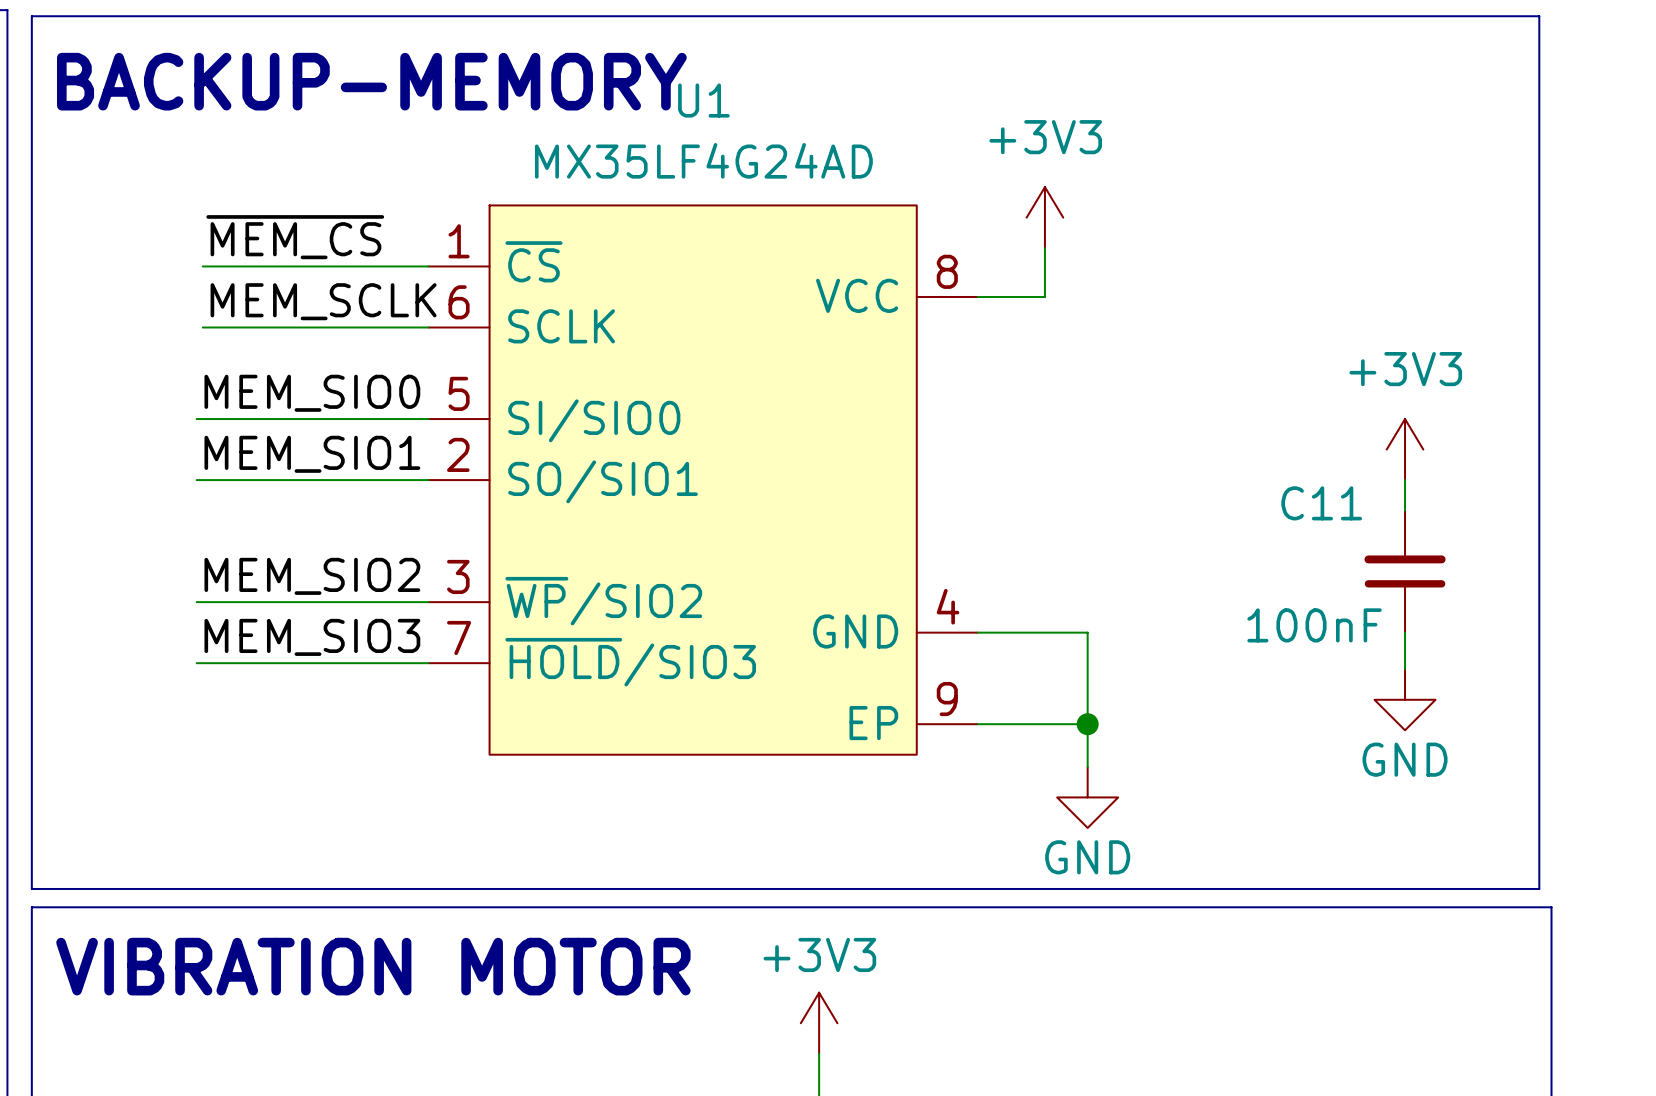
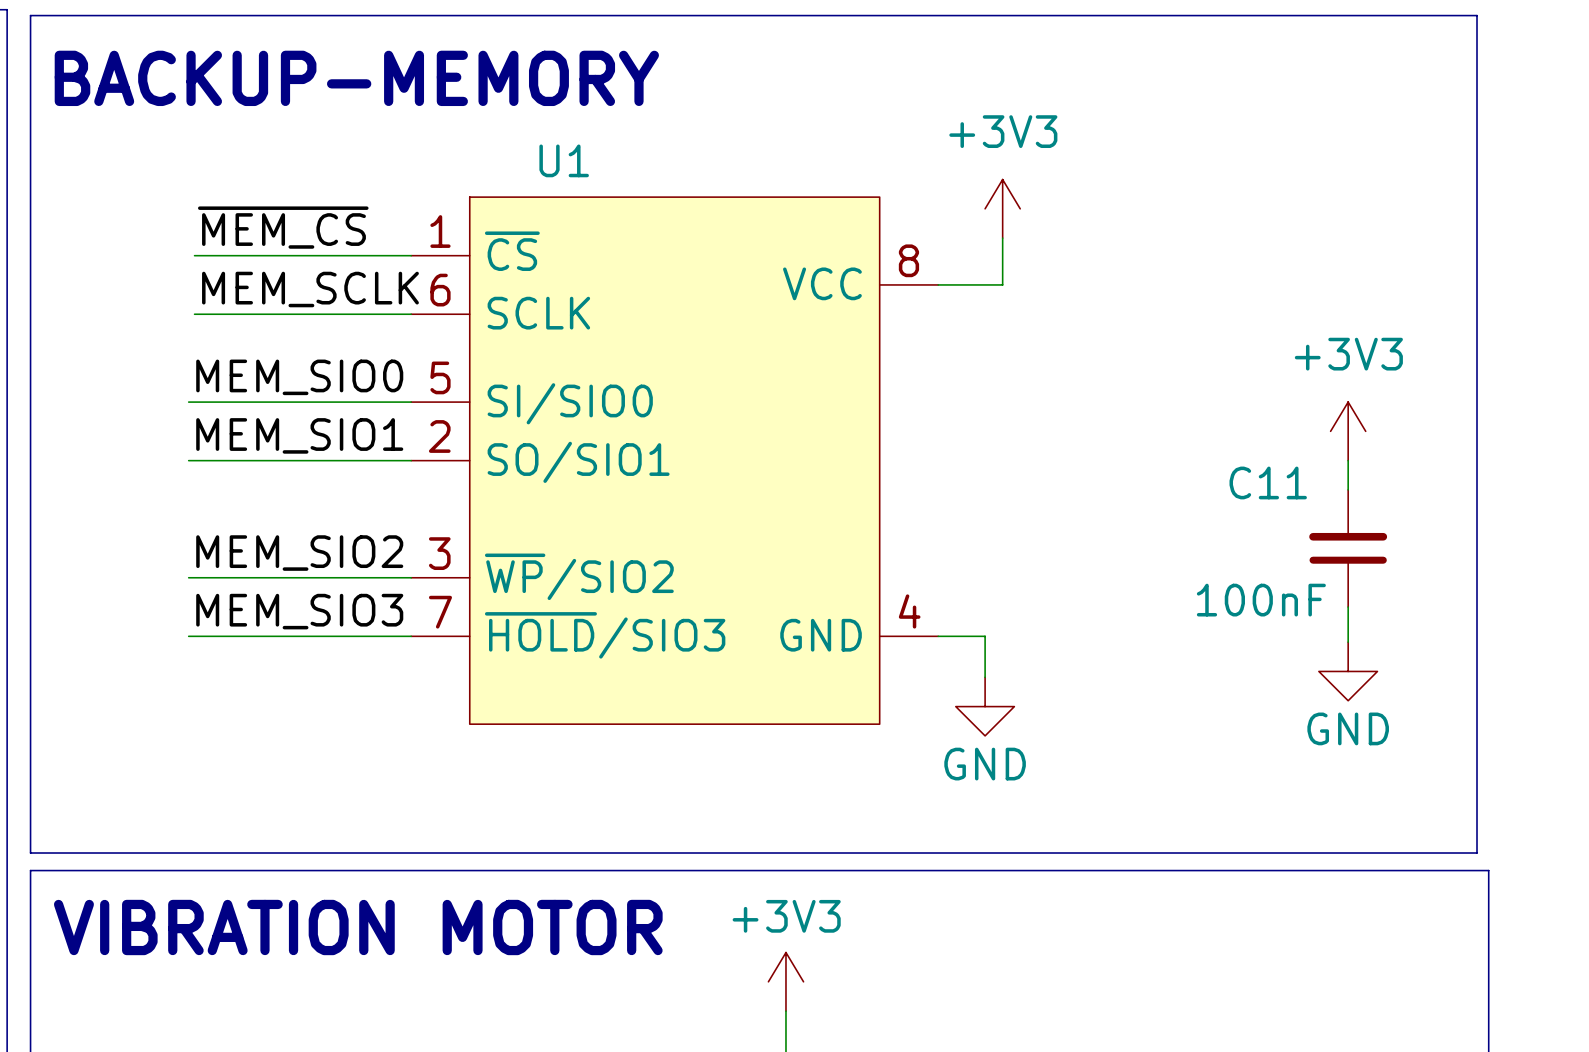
U1 name position: U1 (703, 100) -> U1 (564, 160)
U1 value: MX35LF4G24AD (703, 160) -> none
U1 symbol: [428, 205, 978, 755] -> [411, 197, 939, 725]
wire: (977, 632) (1087, 632) (1087, 766) -> none
wire: none -> (938, 636) (985, 636) (985, 677)
wire: (977, 724) (1087, 724) -> none
junction: (1087, 724) -> none
power symbol position: GND (1087, 797) -> GND (985, 706)

